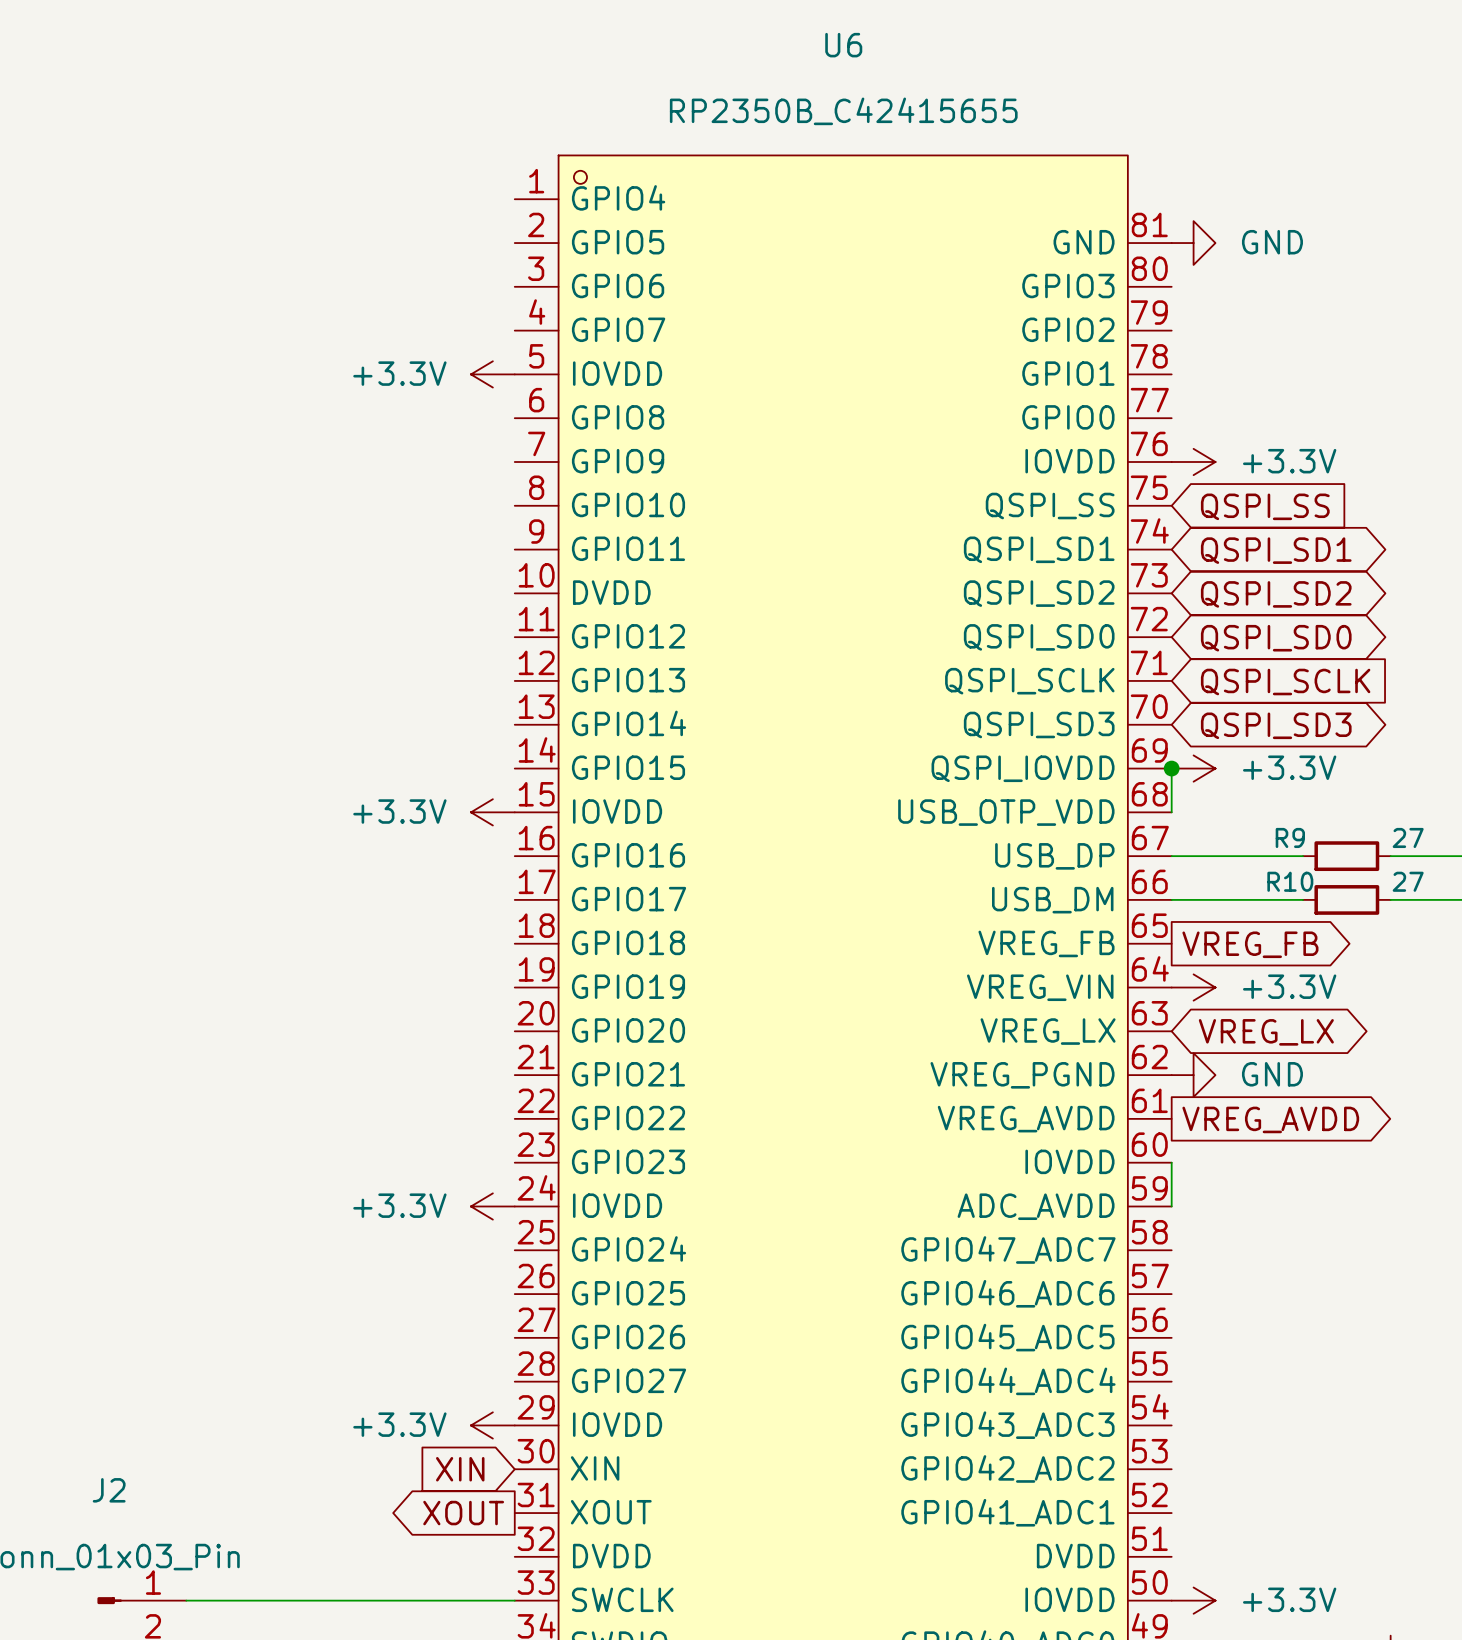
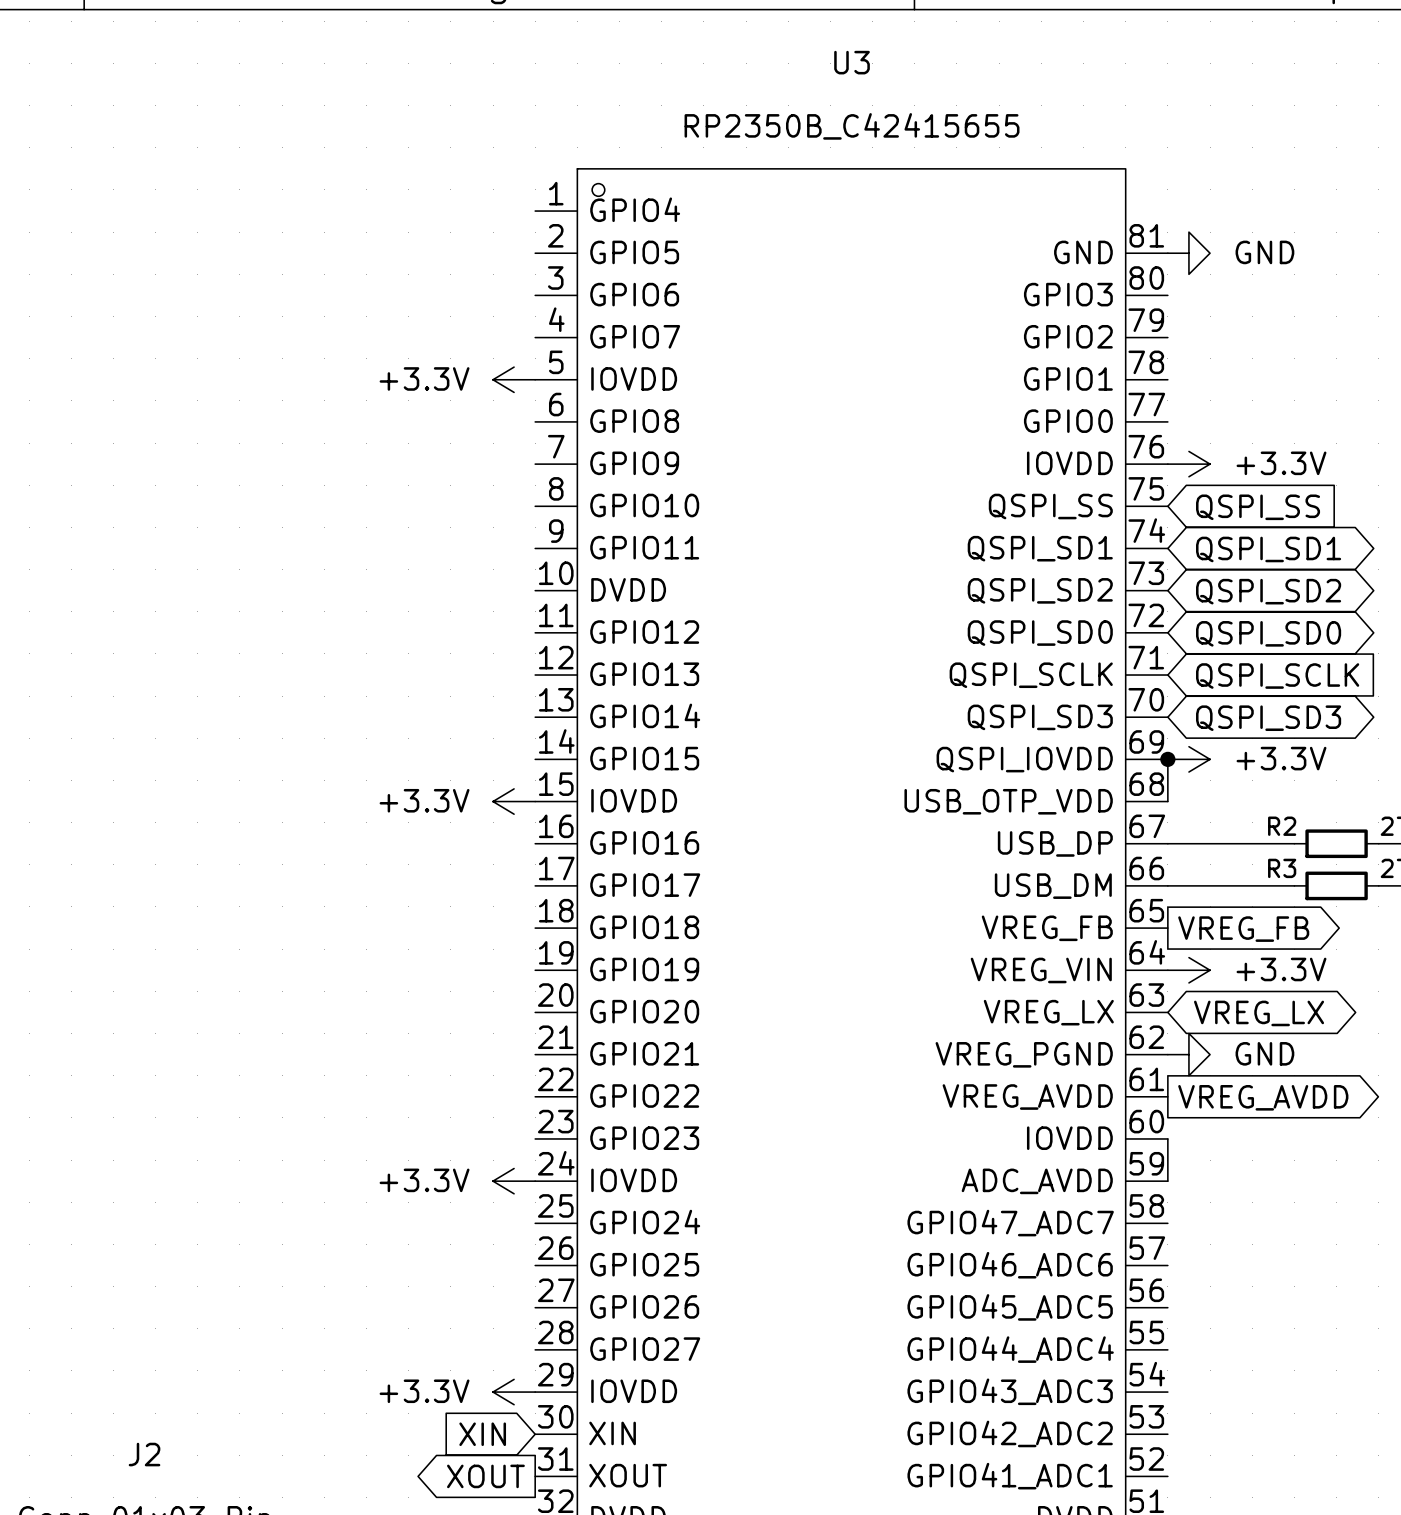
U6 name: U6 (843, 45) -> U3 (852, 62)
R9 name: R9 (1290, 837) -> R2 (1282, 826)
R10 name: R10 (1290, 881) -> R3 (1282, 868)

